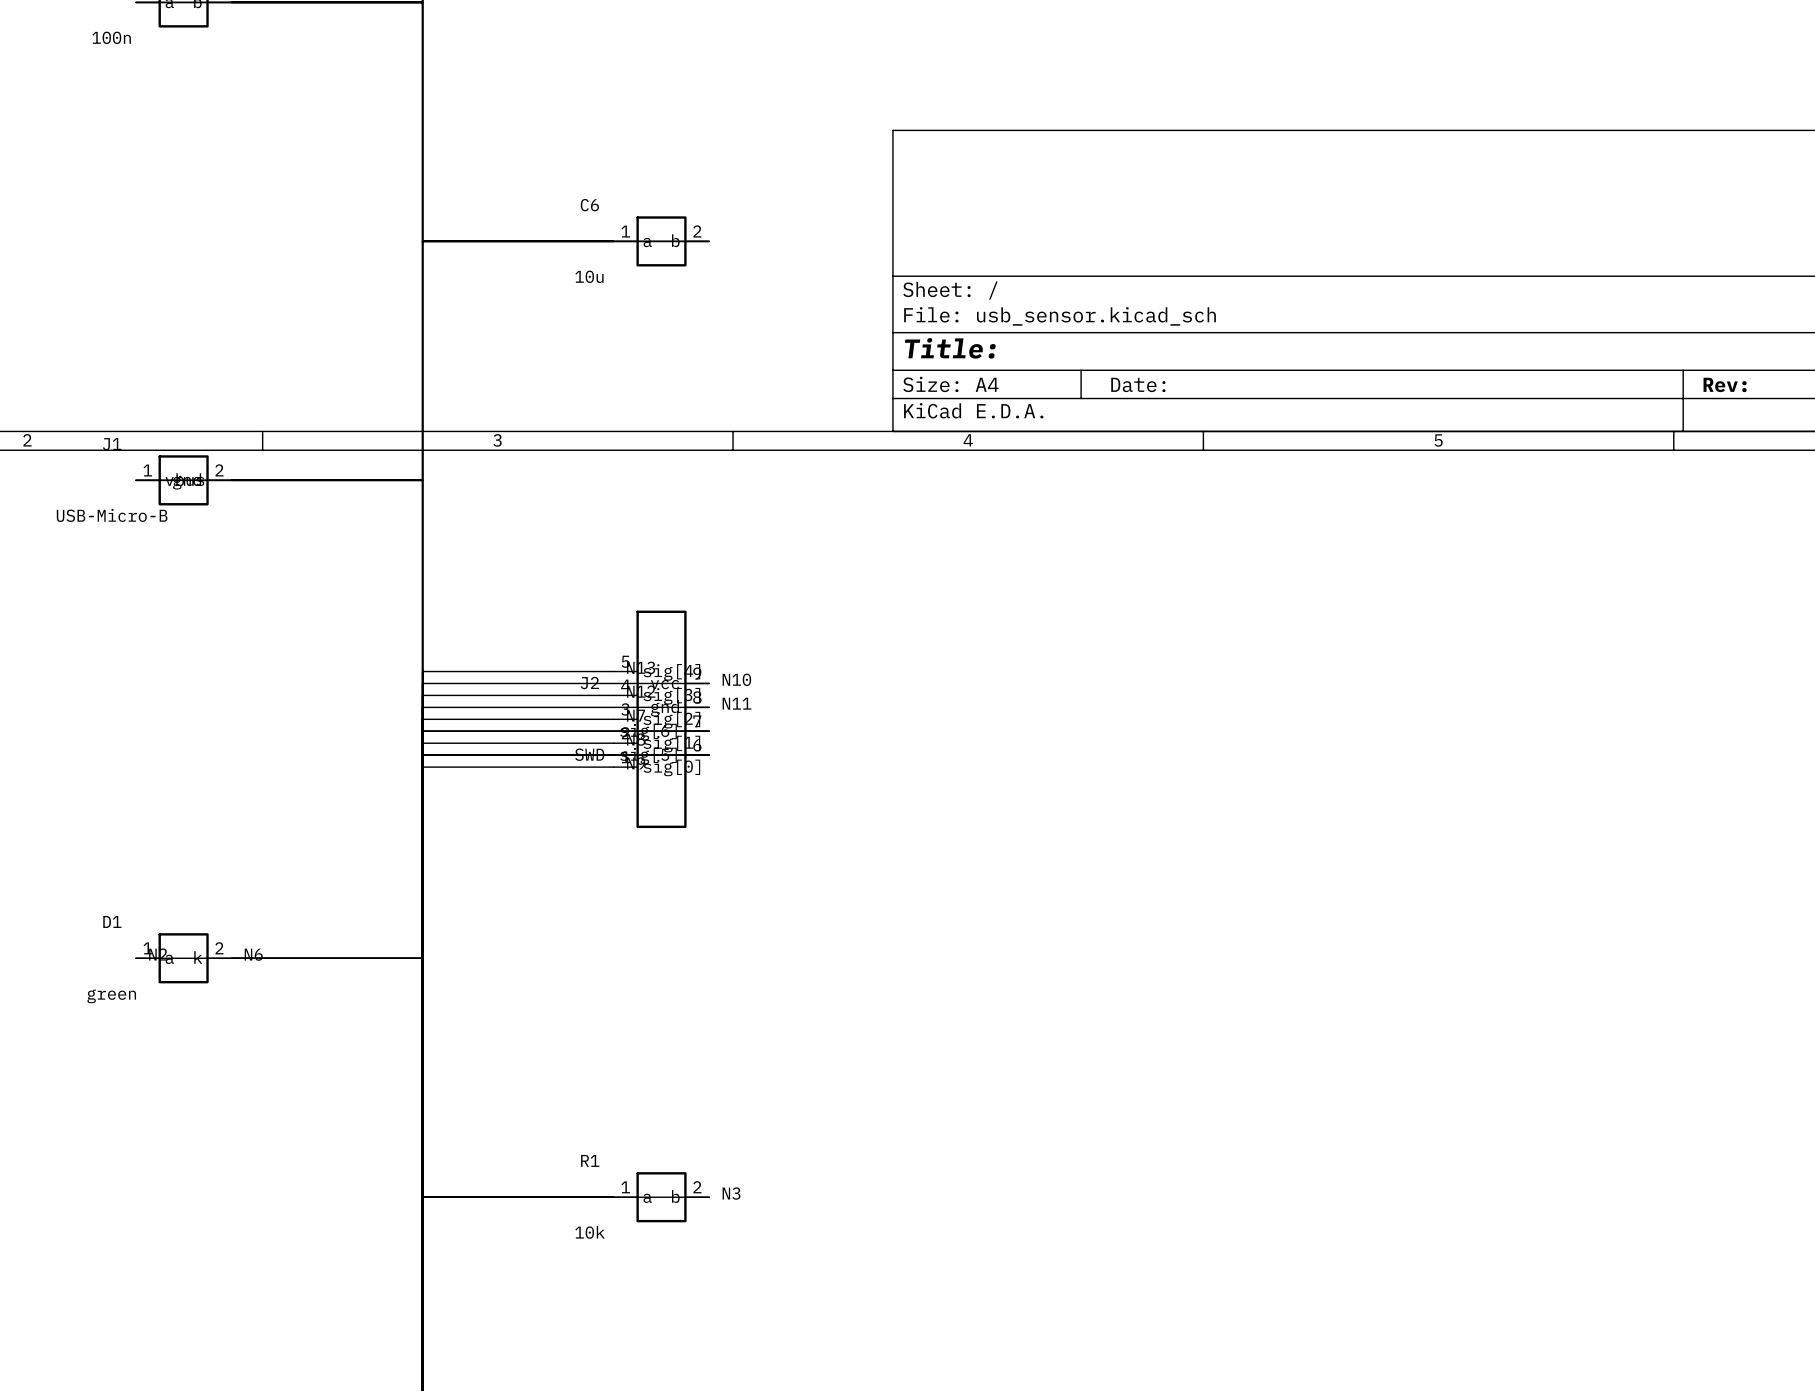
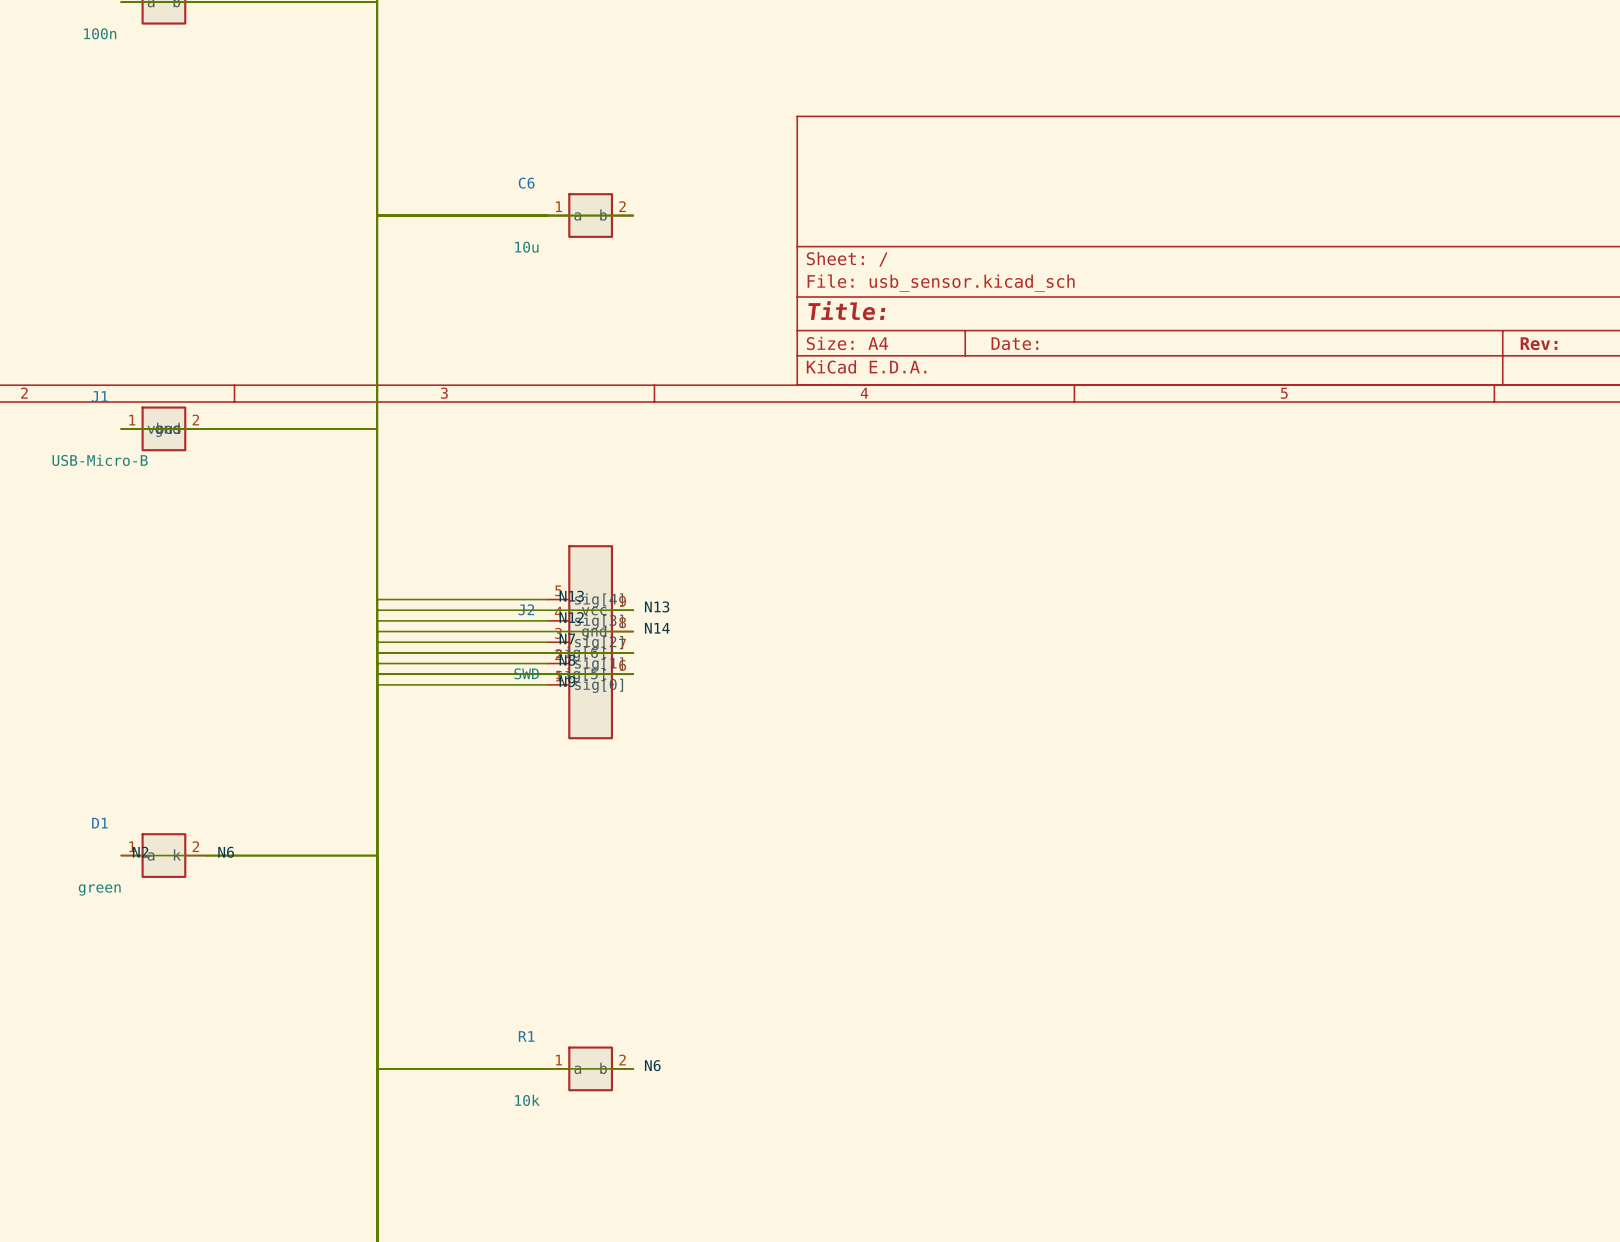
label: N10 (736, 679) -> N13 (657, 606)
label: N11 (736, 703) -> N14 (657, 628)
label: N3 (731, 1193) -> N6 (652, 1065)

